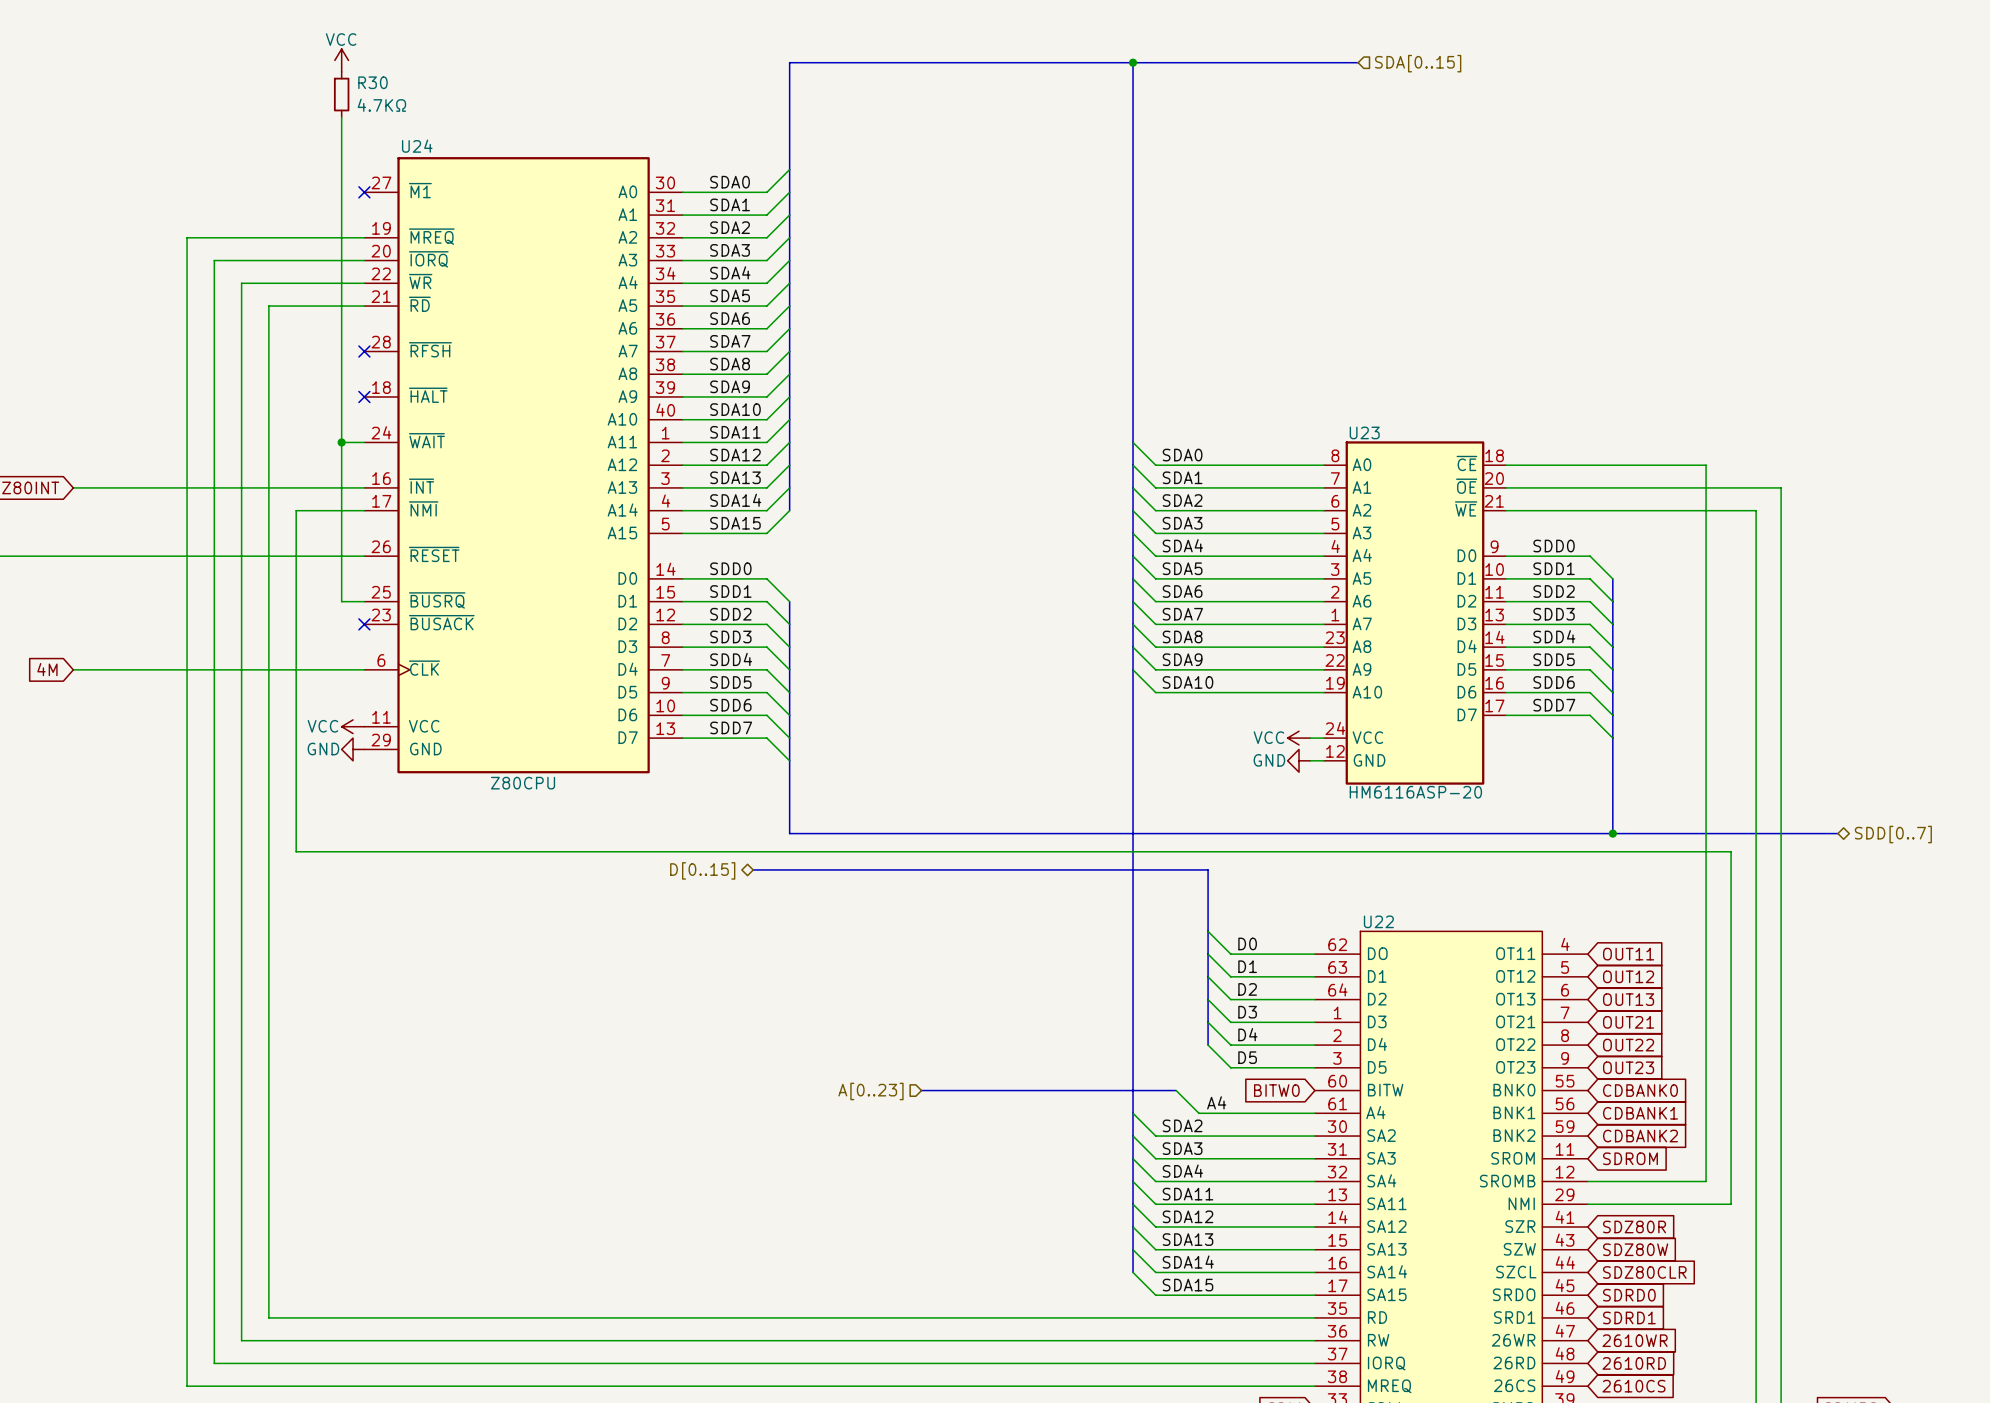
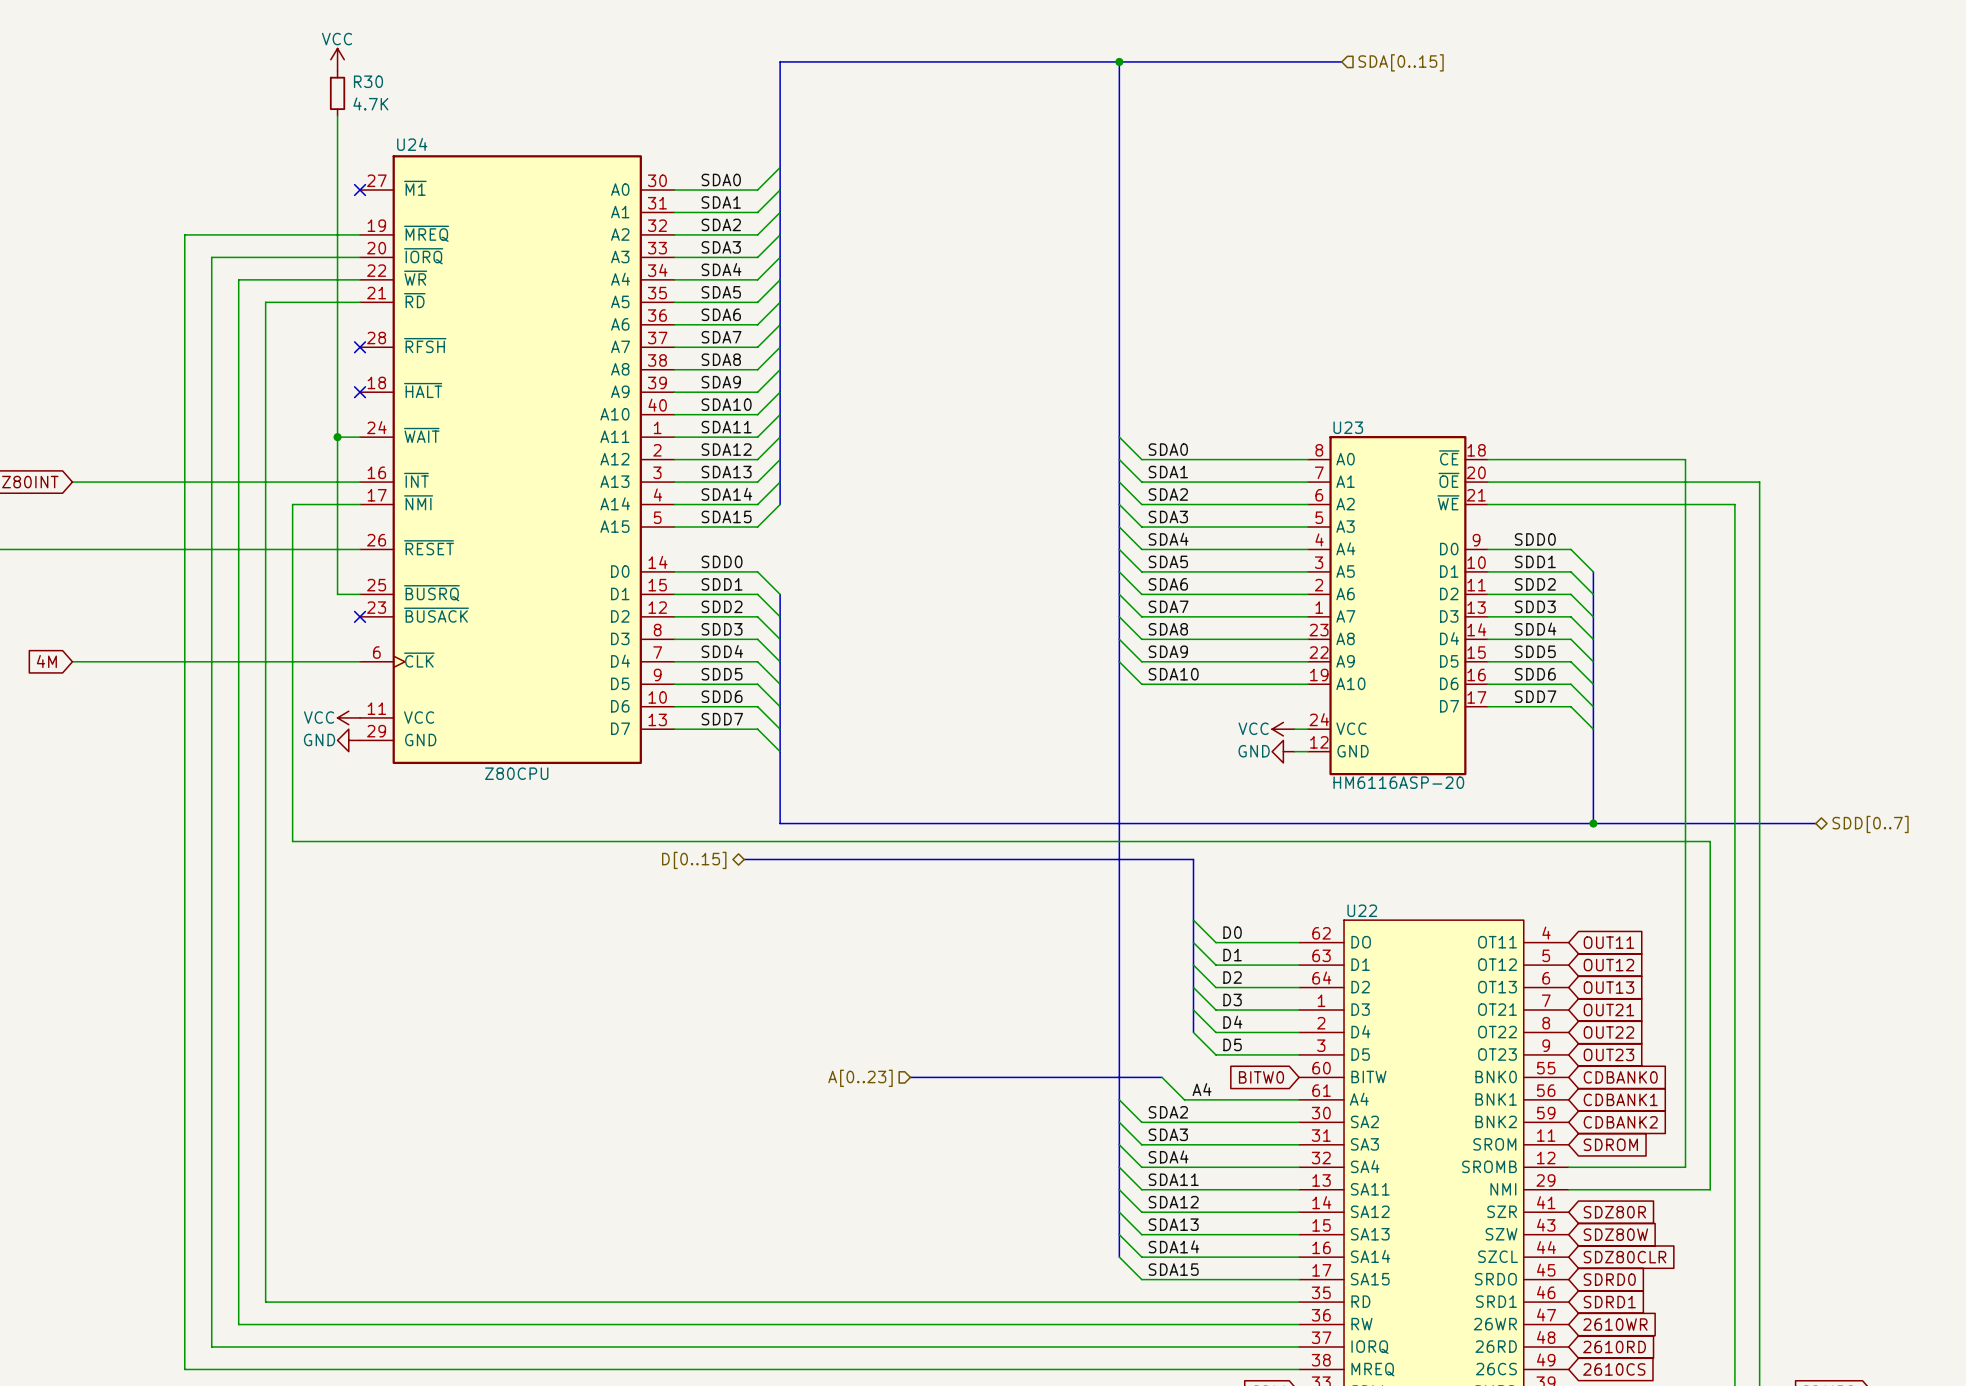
R30 value: 4.7KΩ (381, 105) -> 4.7K (370, 103)

